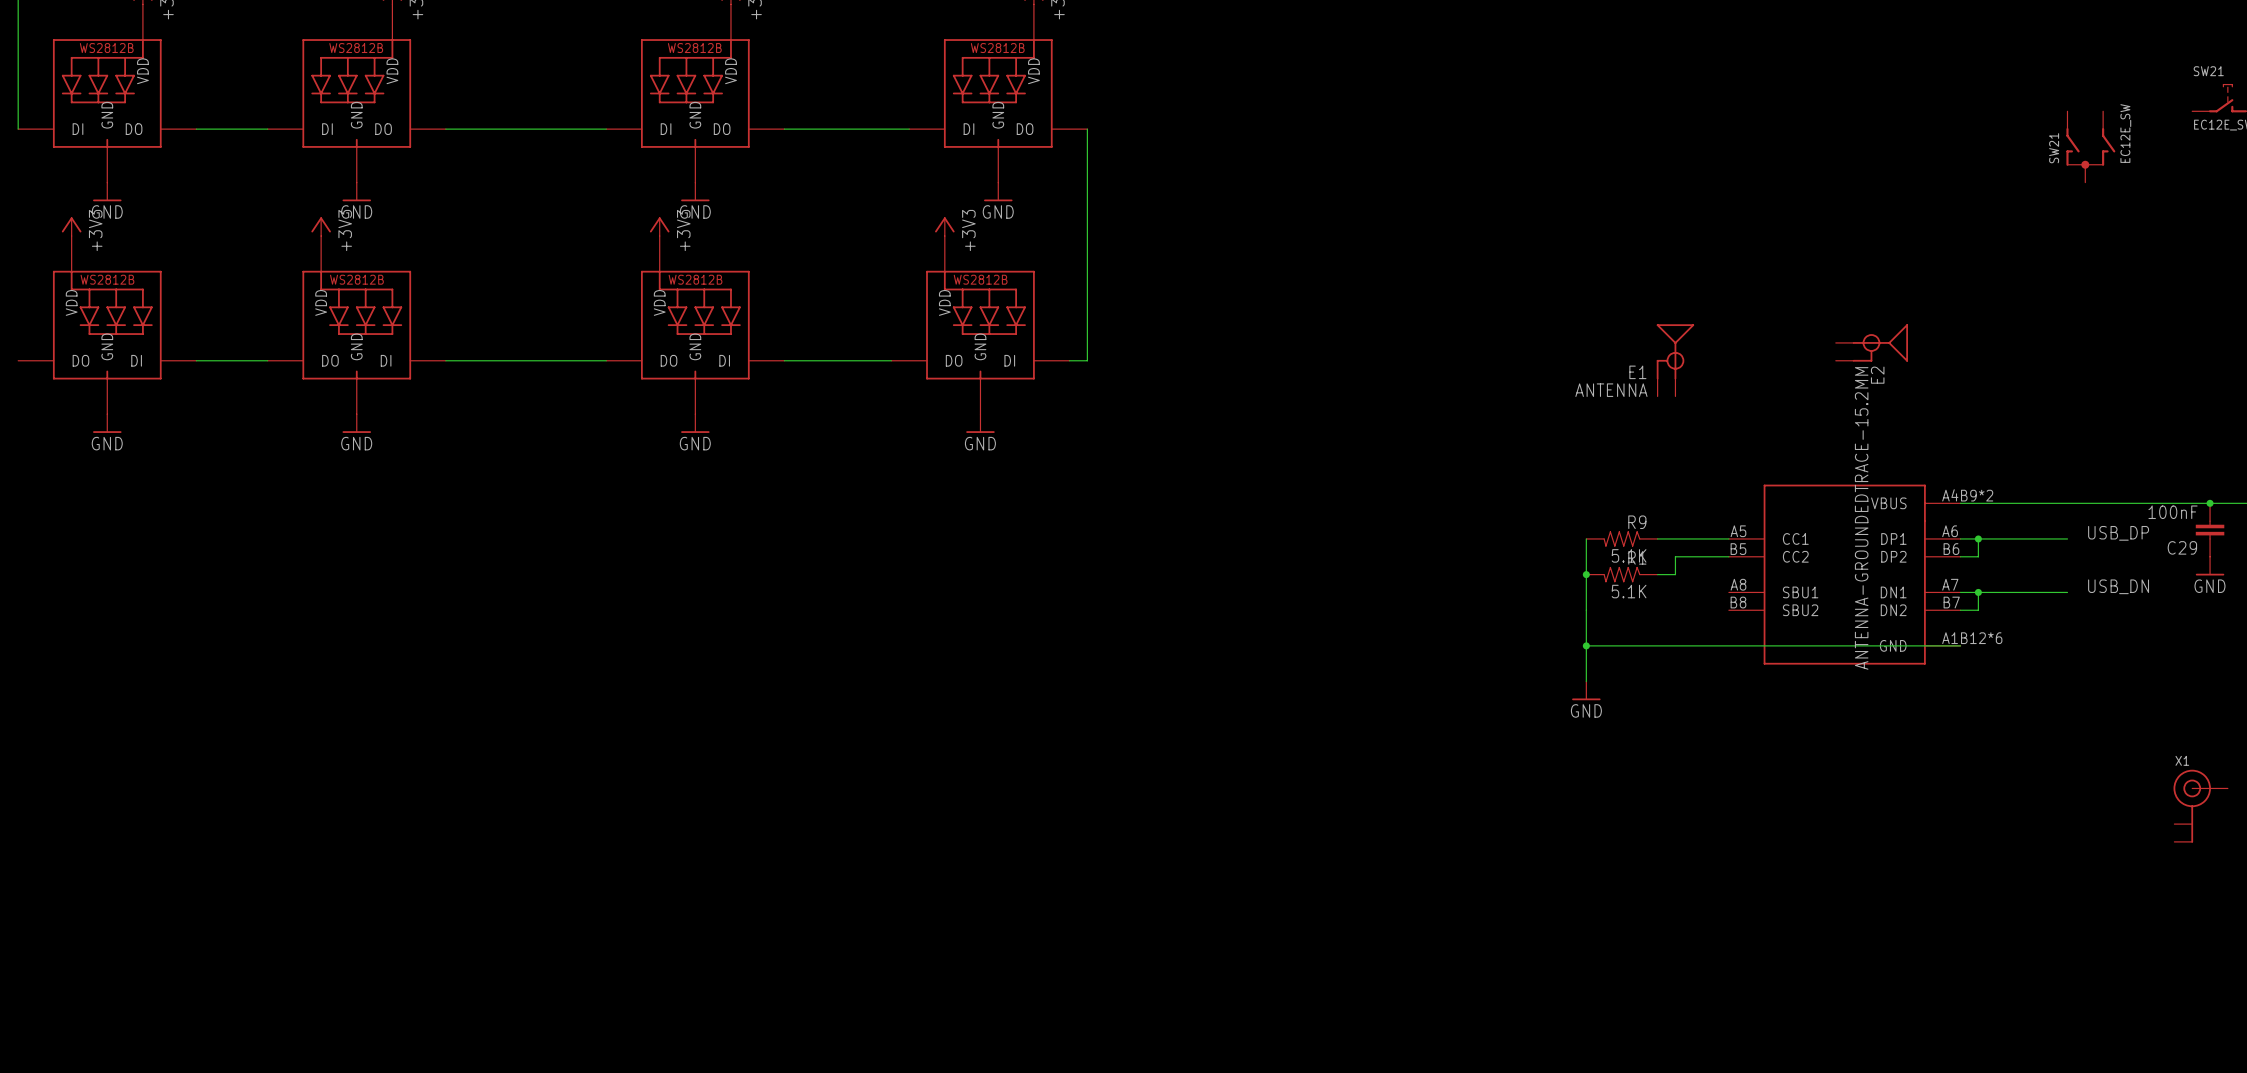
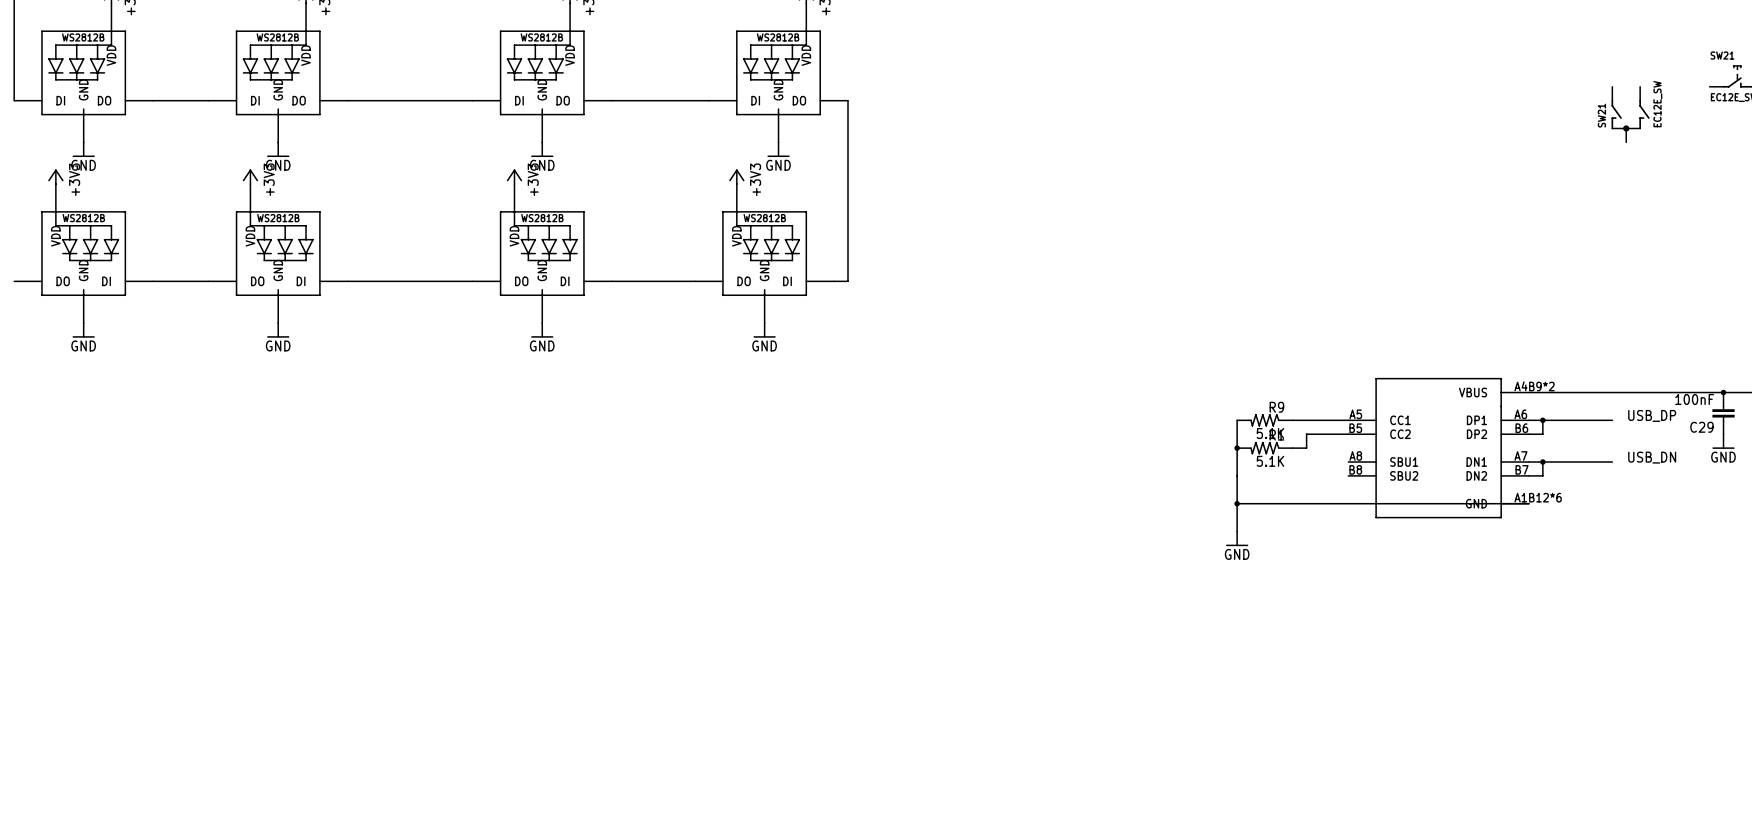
E2: ANTENNA-GROUNDEDTRACE-15.2MM (1871, 342) -> none
E1: ANTENNA (1675, 360) -> none
X1: (2200, 806) -> none

